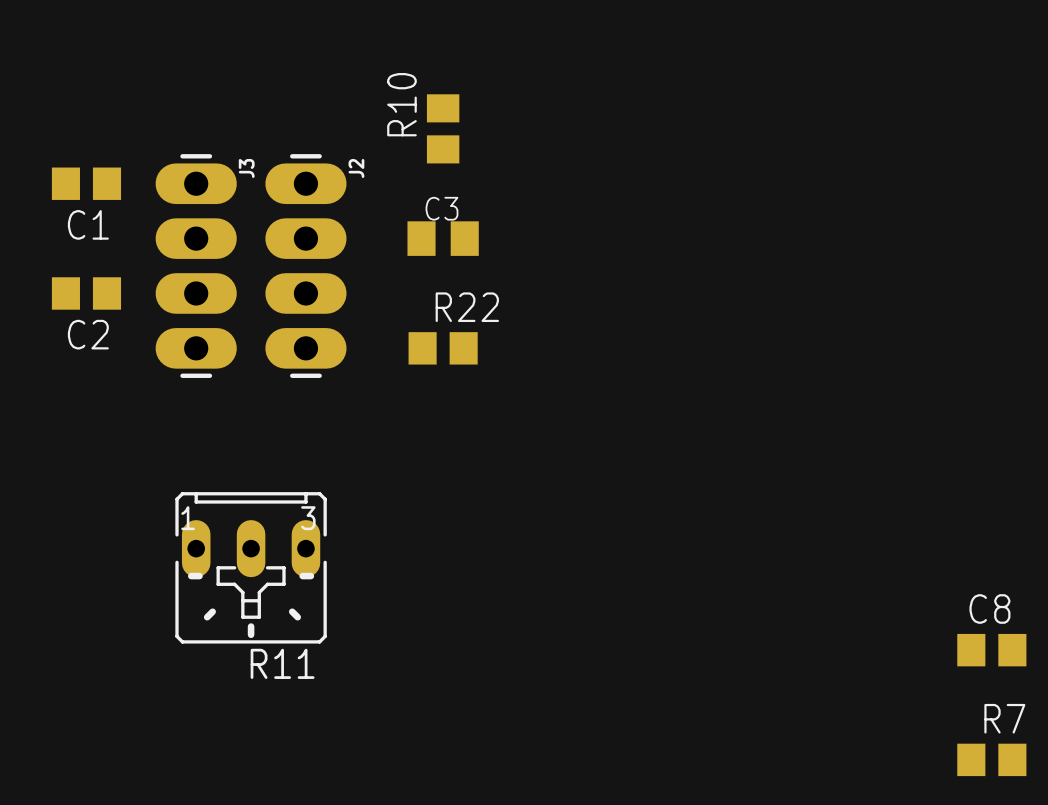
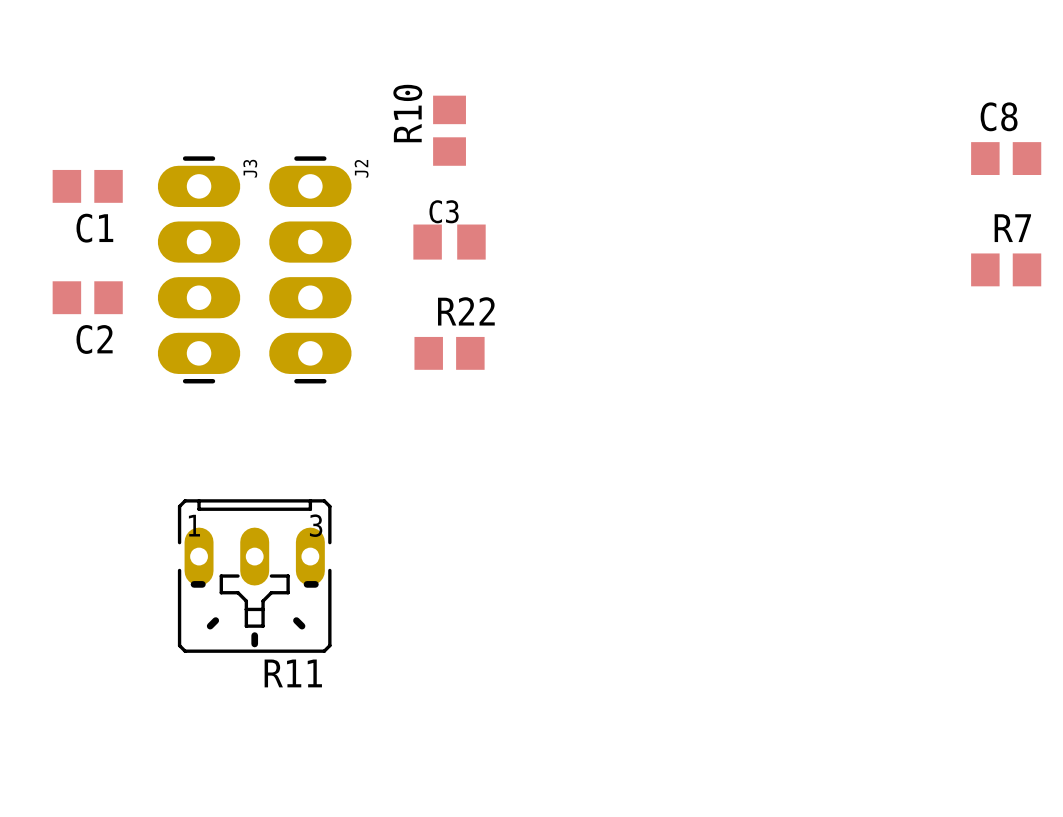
C8 position: (991, 650) -> (1006, 158)
R7 position: (991, 759) -> (1006, 269)

